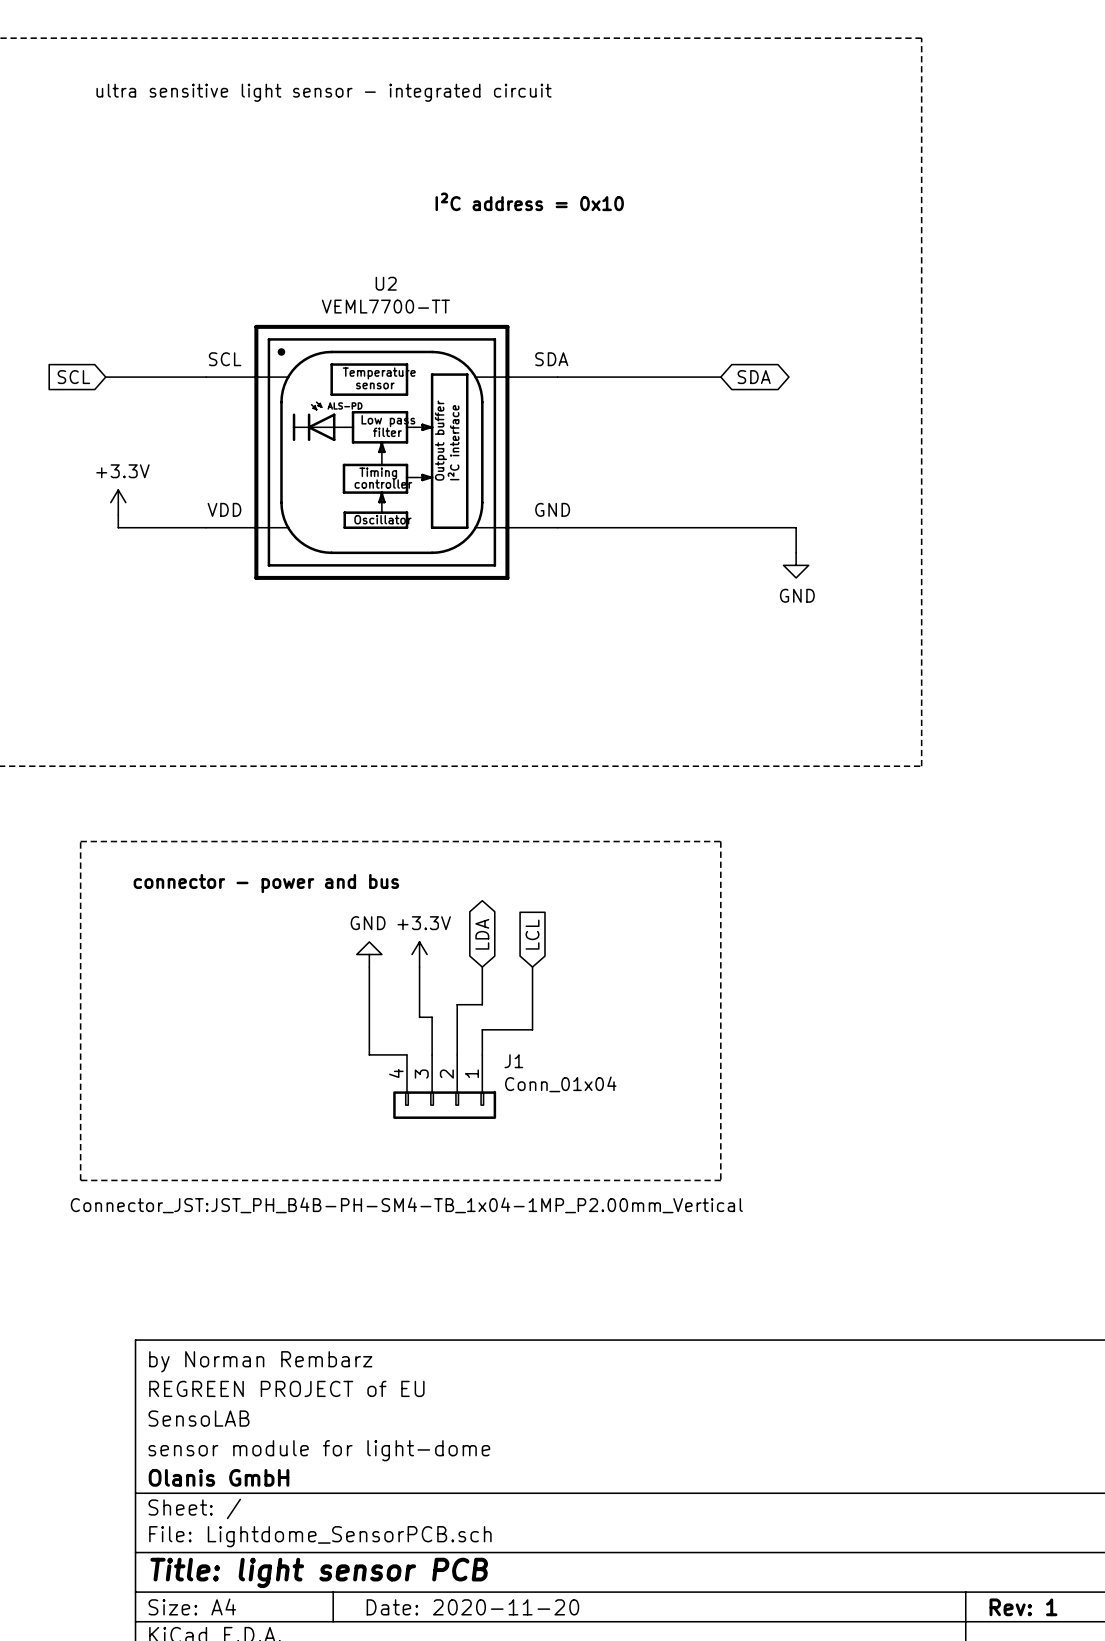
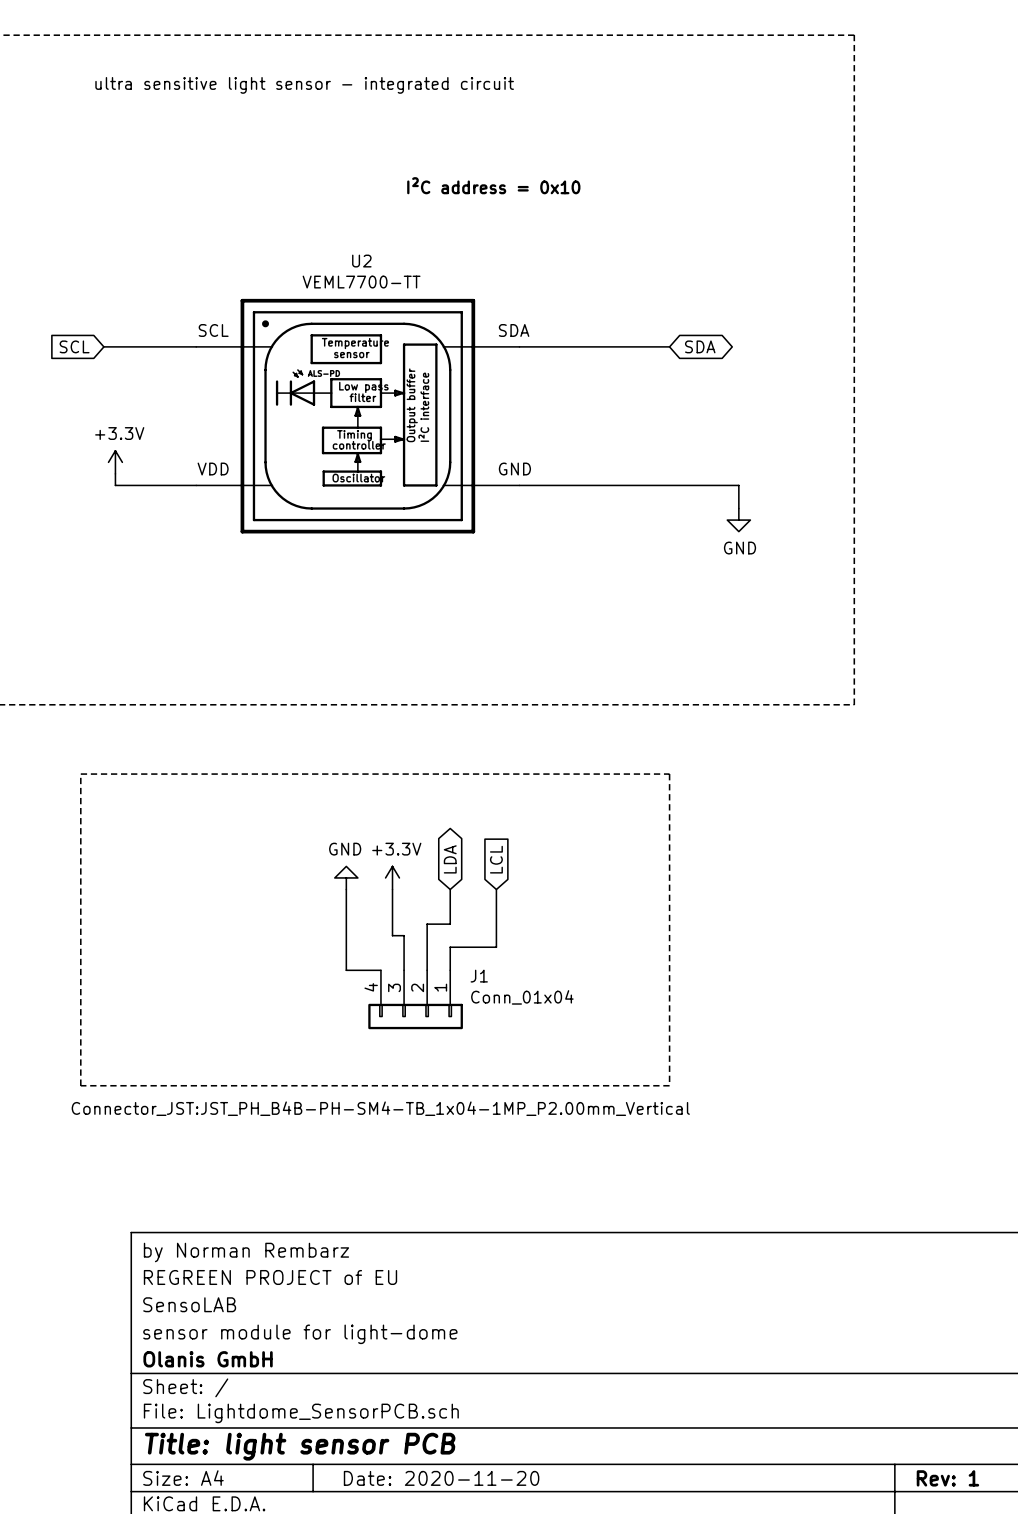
text: connector - power and bus (266, 883) -> none

